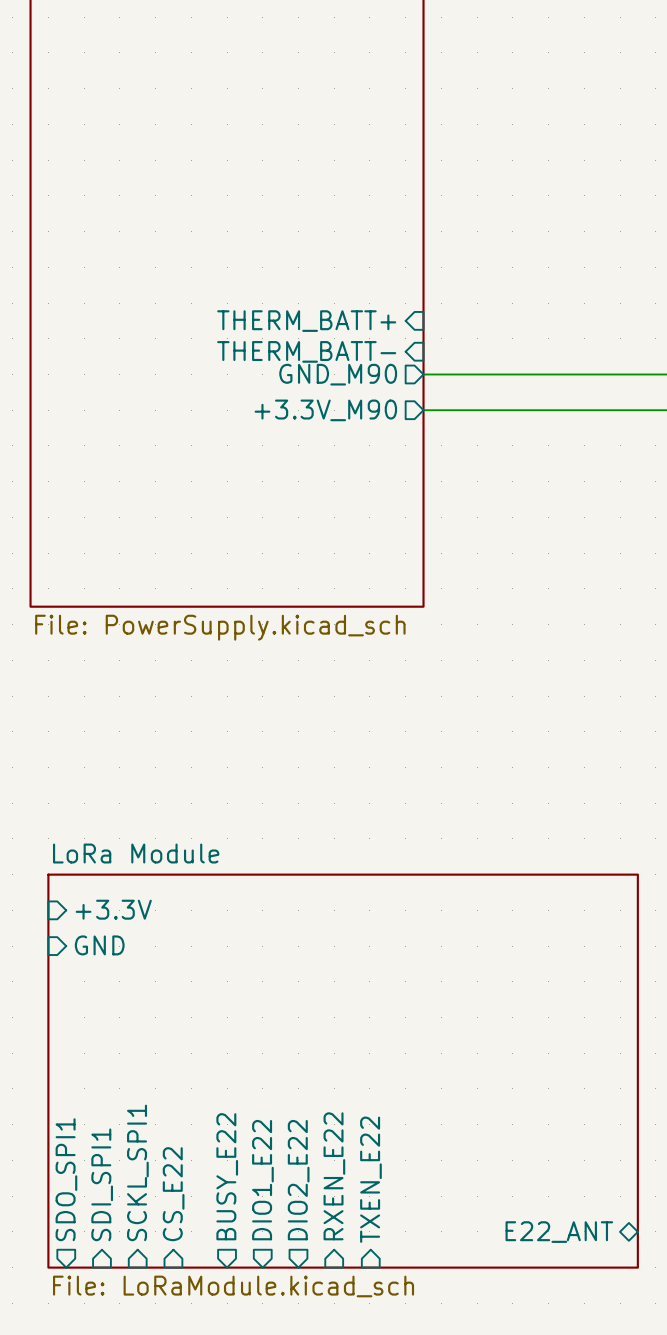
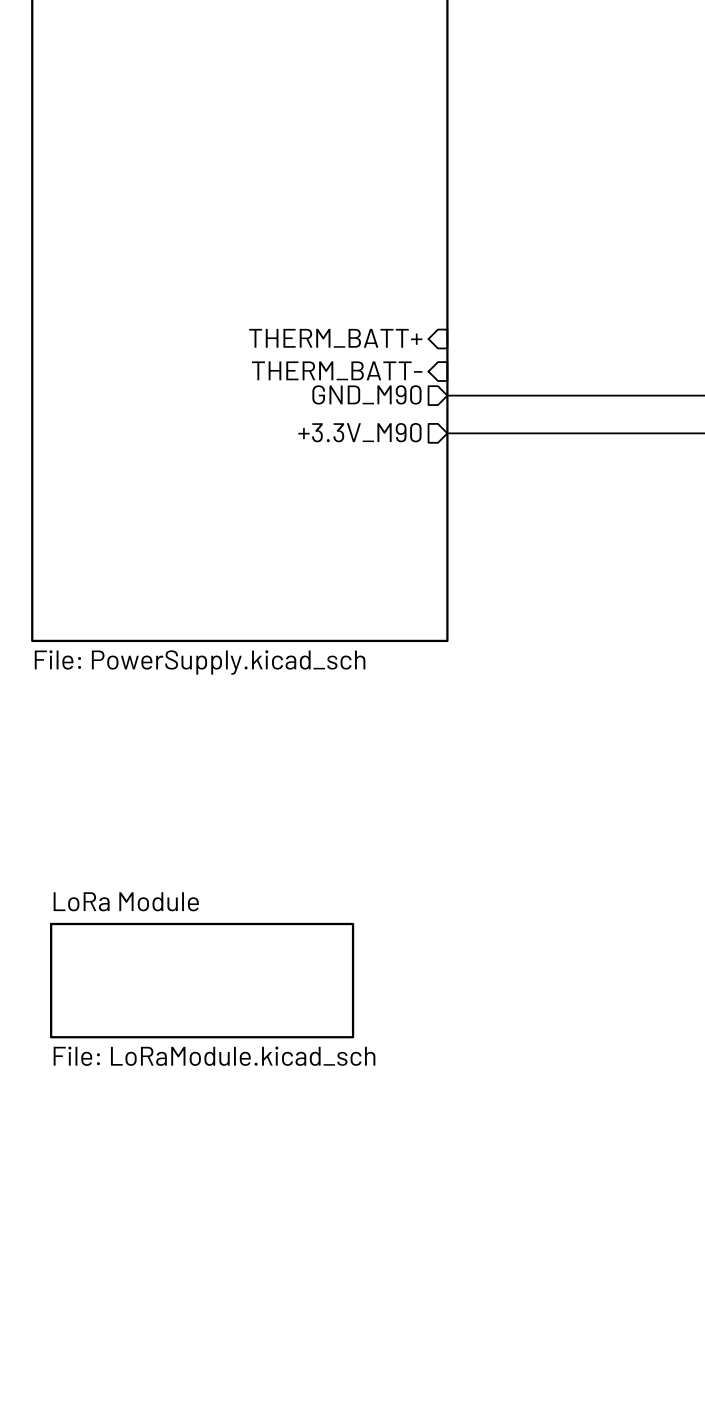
sheet pin: +3.3V (113, 909) -> none
sheet LoRa Module: none -> File: LoRaModule.kicad_sch (202, 980)
sheet pin: GND (99, 945) -> none
sheet LoRa Module: File: LoRaModule.kicad_sch (343, 1071) -> none
sheet pin: SCKL_SPI1 (137, 1172) -> none
sheet pin: BUSY_E22 (227, 1176) -> none
sheet pin: RXEN_E22 (334, 1176) -> none
sheet pin: SDO_SPI1 (66, 1179) -> none
sheet pin: TXEN_E22 (370, 1179) -> none
sheet pin: DIO1_E22 (262, 1180) -> none
sheet pin: DIO2_E22 (298, 1180) -> none
sheet pin: SDI_SPI1 (102, 1184) -> none
sheet pin: CS_E22 (173, 1194) -> none
sheet pin: E22_ANT (559, 1232) -> none

